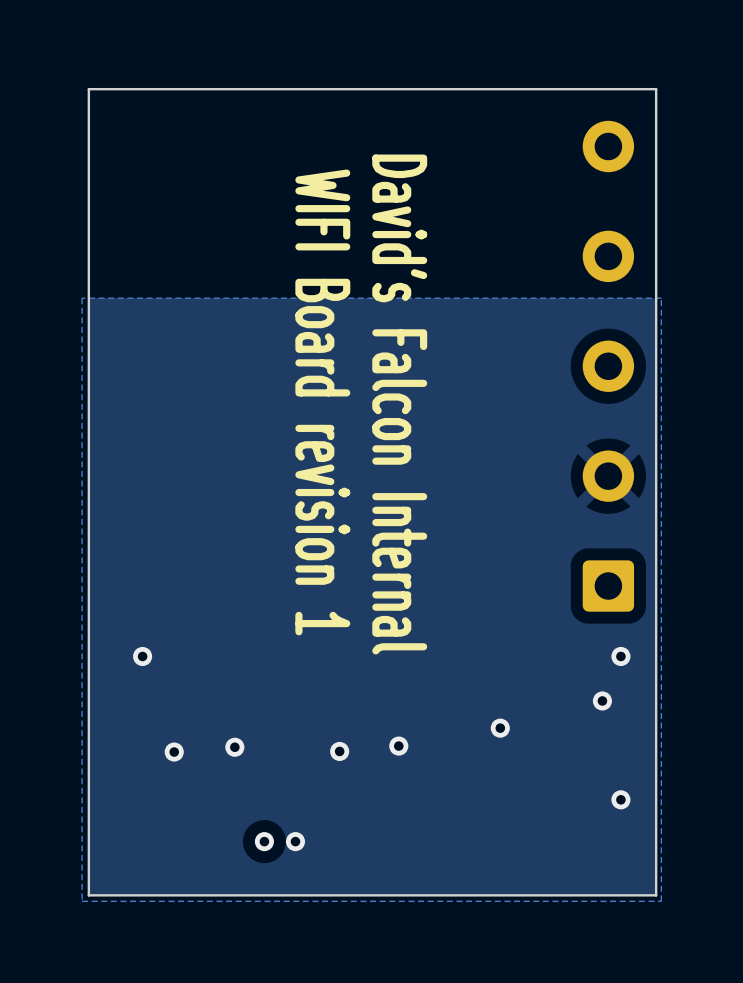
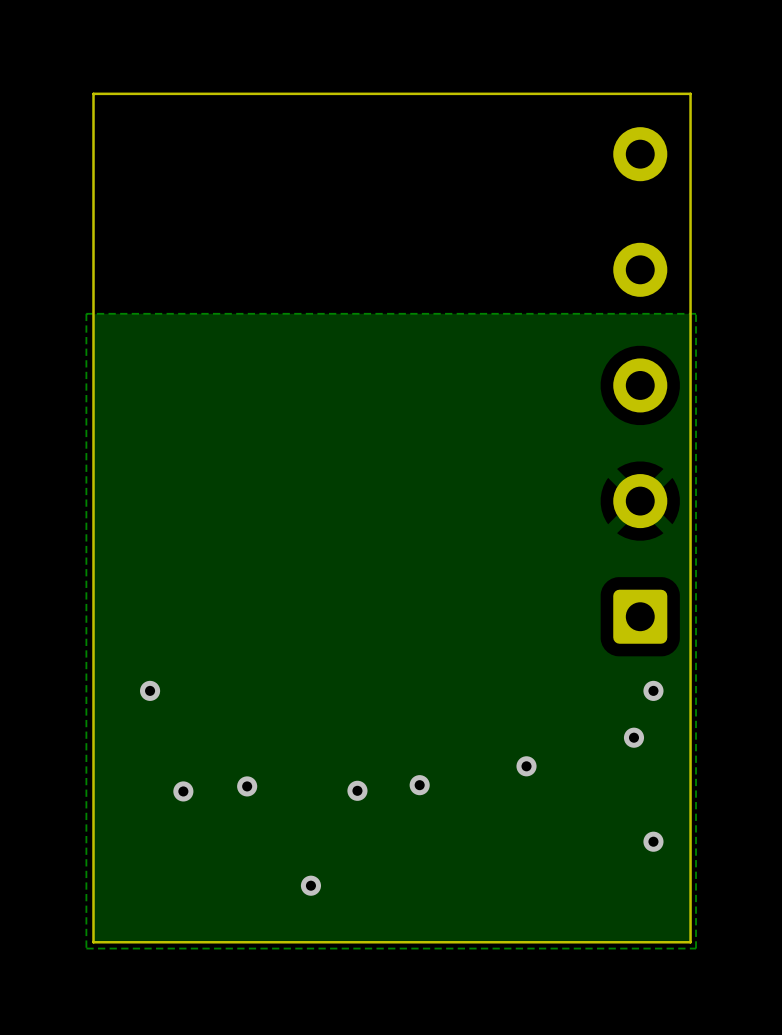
text: WIFI Board revision 1 (322, 402) -> none
text: David's Falcon Internal (399, 404) -> none
via: (264, 841) -> none

